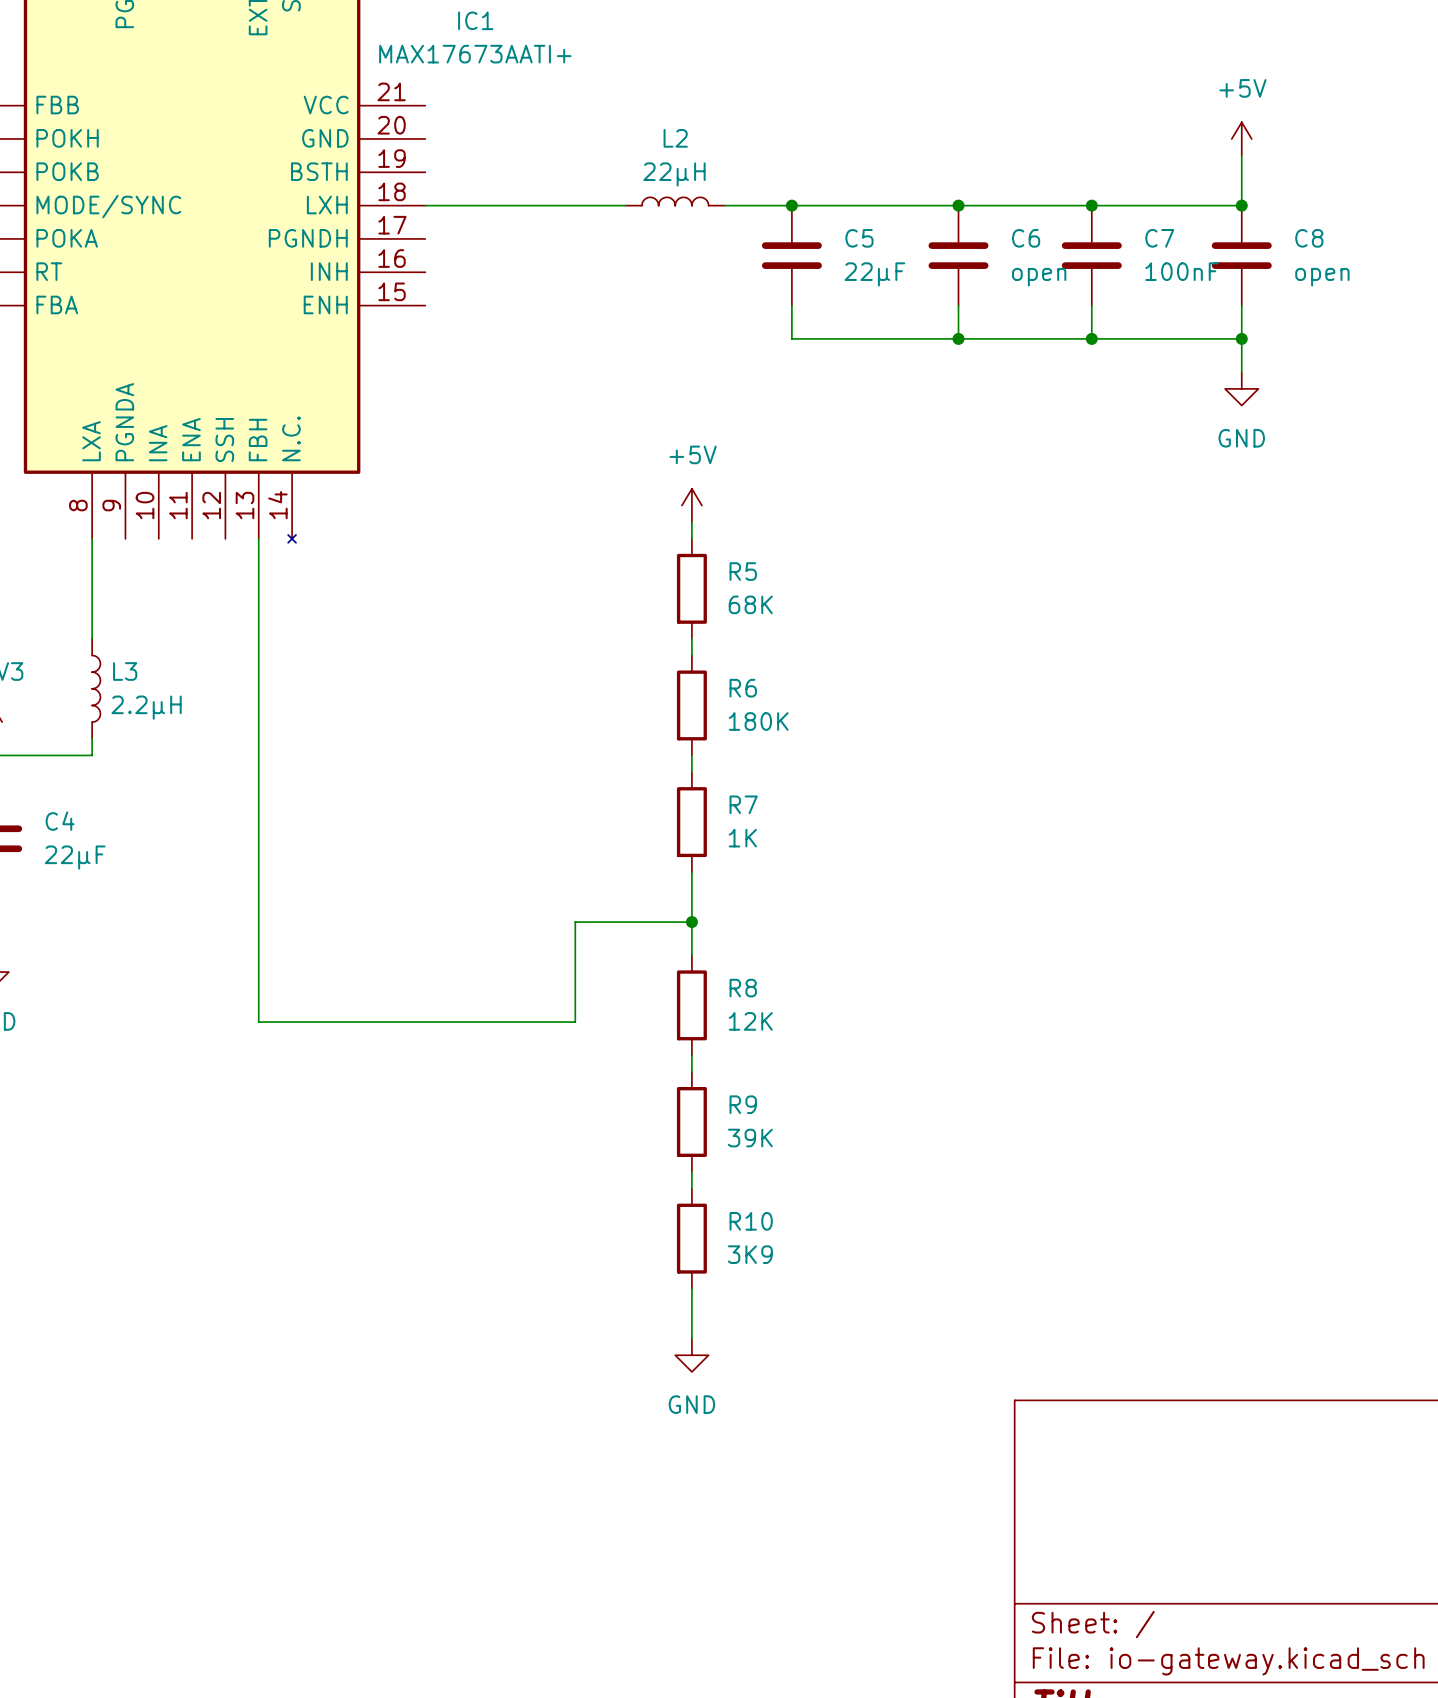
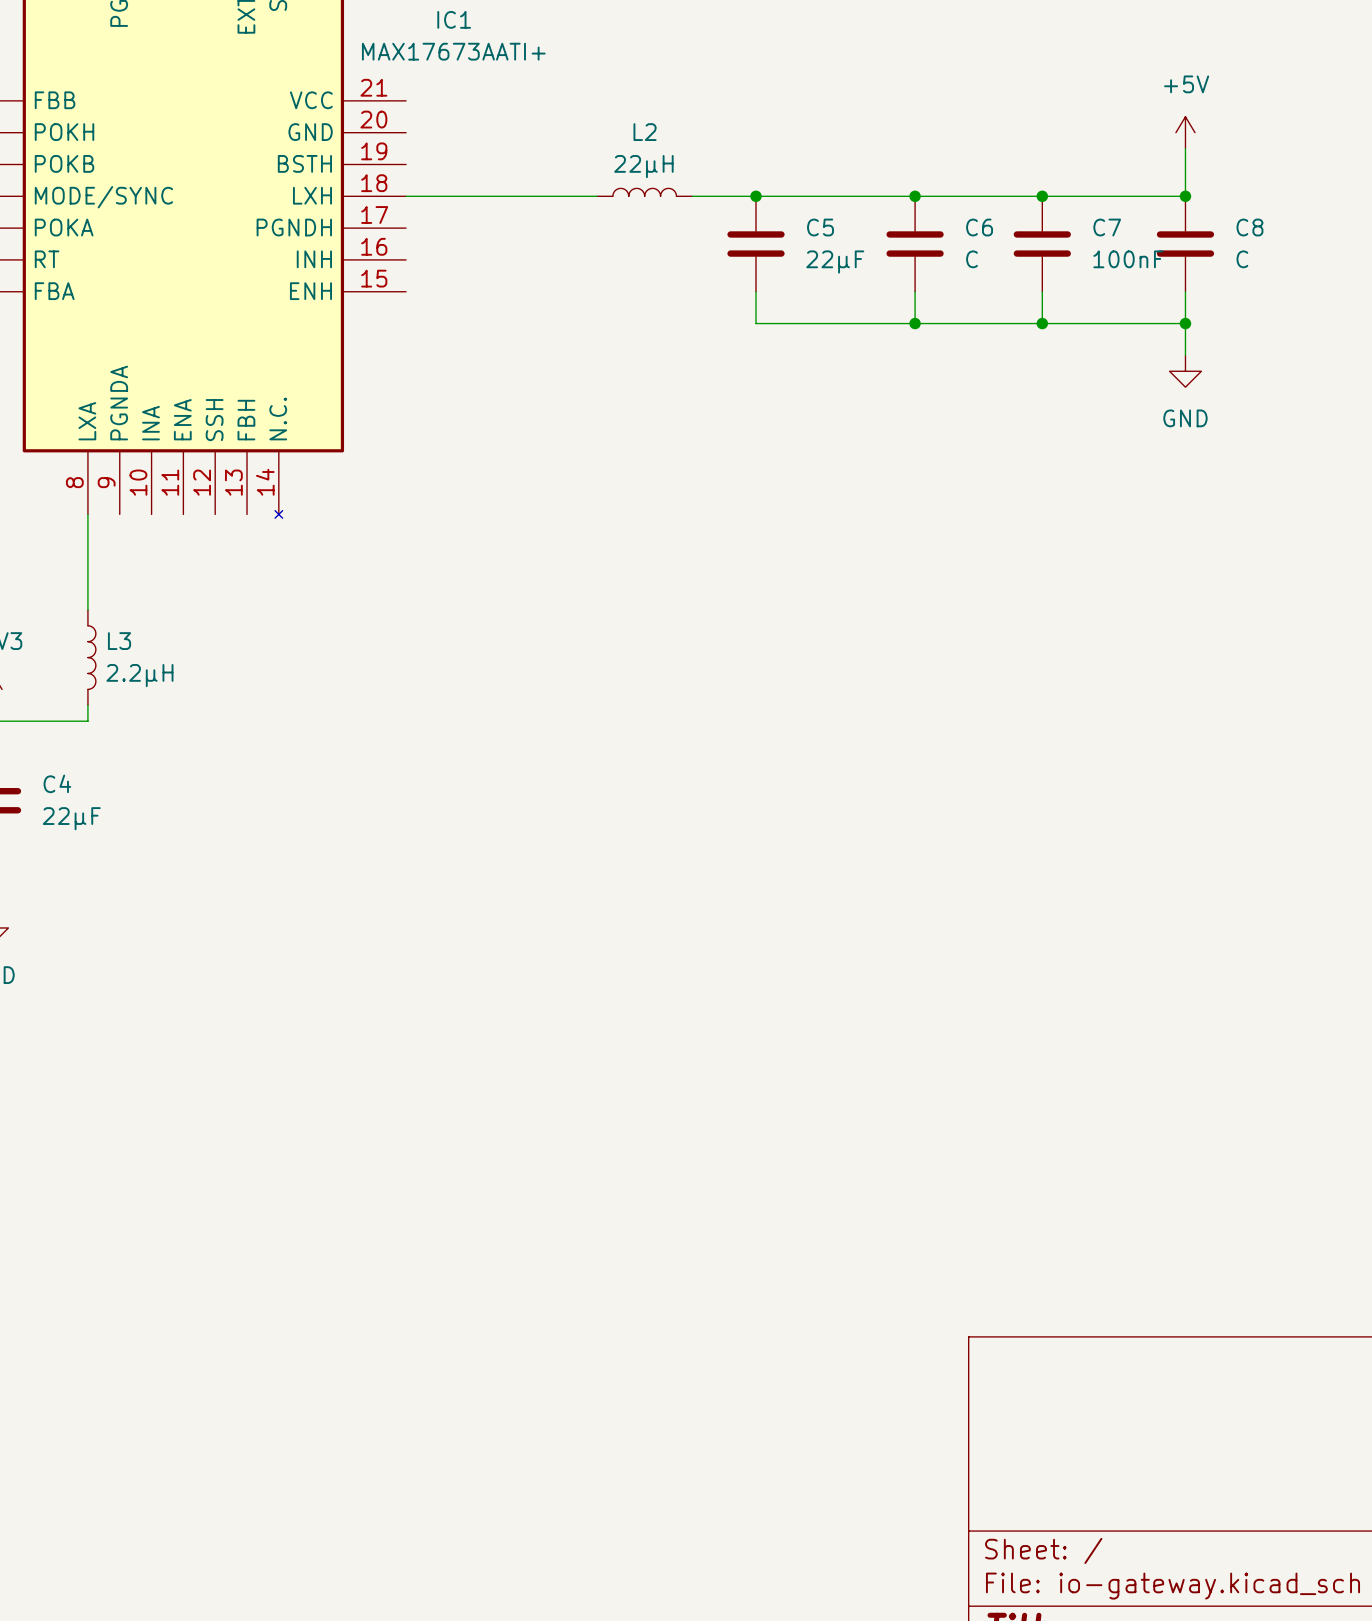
C6 value: open (1039, 277) -> C (971, 259)
C8 value: open (1322, 277) -> C (1242, 259)
power symbol: +5V (691, 505) -> none
wire: (691, 522) (691, 538) -> none
wire: (258, 538) (258, 1022) (575, 1022) (575, 922) (691, 922) -> none
R5: 68K (691, 588) -> none
wire: (691, 638) (691, 655) -> none
R6: 180K (691, 705) -> none
wire: (691, 755) (691, 772) -> none
R7: 1K (691, 822) -> none
wire: (691, 872) (691, 955) -> none
junction: (691, 922) -> none
R8: 12K (691, 1005) -> none
wire: (691, 1055) (691, 1072) -> none
R9: 39K (691, 1122) -> none
wire: (691, 1171) (691, 1188) -> none
R10: 3K9 (691, 1238) -> none
wire: (691, 1288) (691, 1338) -> none
power symbol: GND (691, 1355) -> none

